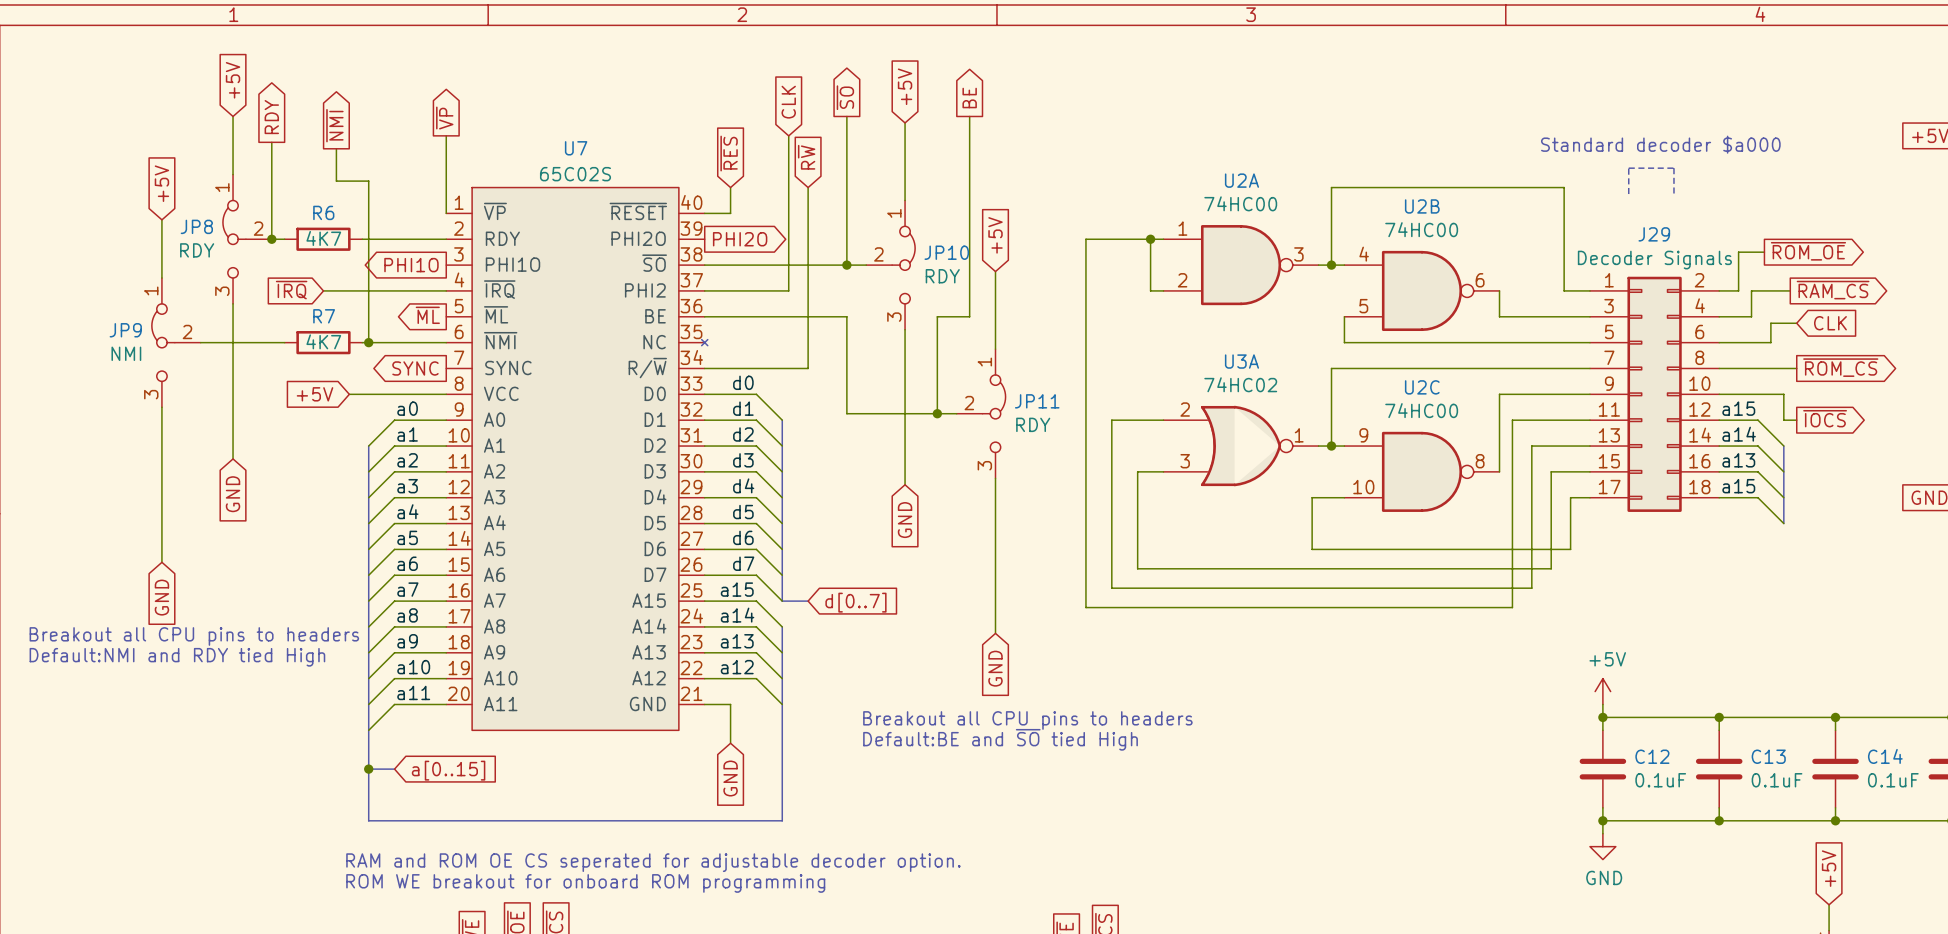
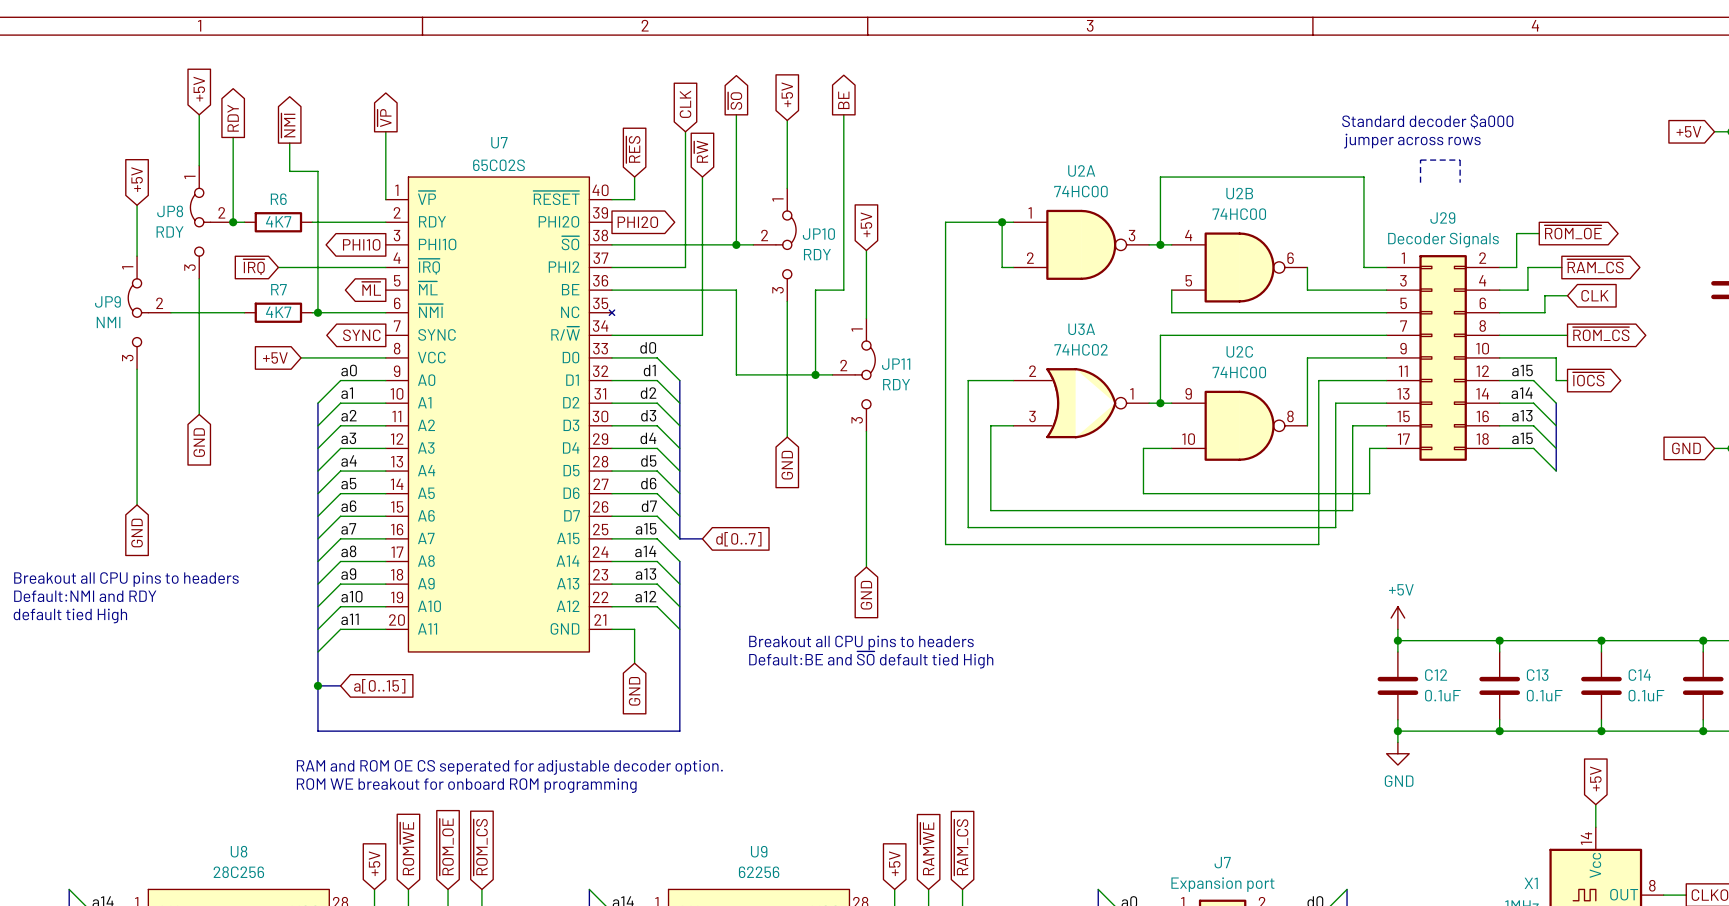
text: none -> Standard decoder $a000 (1427, 121)
text: Standard decoder $a000 (1660, 144) -> jumper across rows (1412, 141)
text position: Breakout all CPU pins to headers (194, 636) -> Breakout all CPU pins to headers (126, 579)
text: Default:NMI and RDY tied High (177, 657) -> Default:NMI and RDY (85, 596)
text: none -> default tied High (70, 615)
text: Default:BE and ~{SO} tied High (1000, 739) -> Default:BE and ~{SO} default tied High (871, 659)

